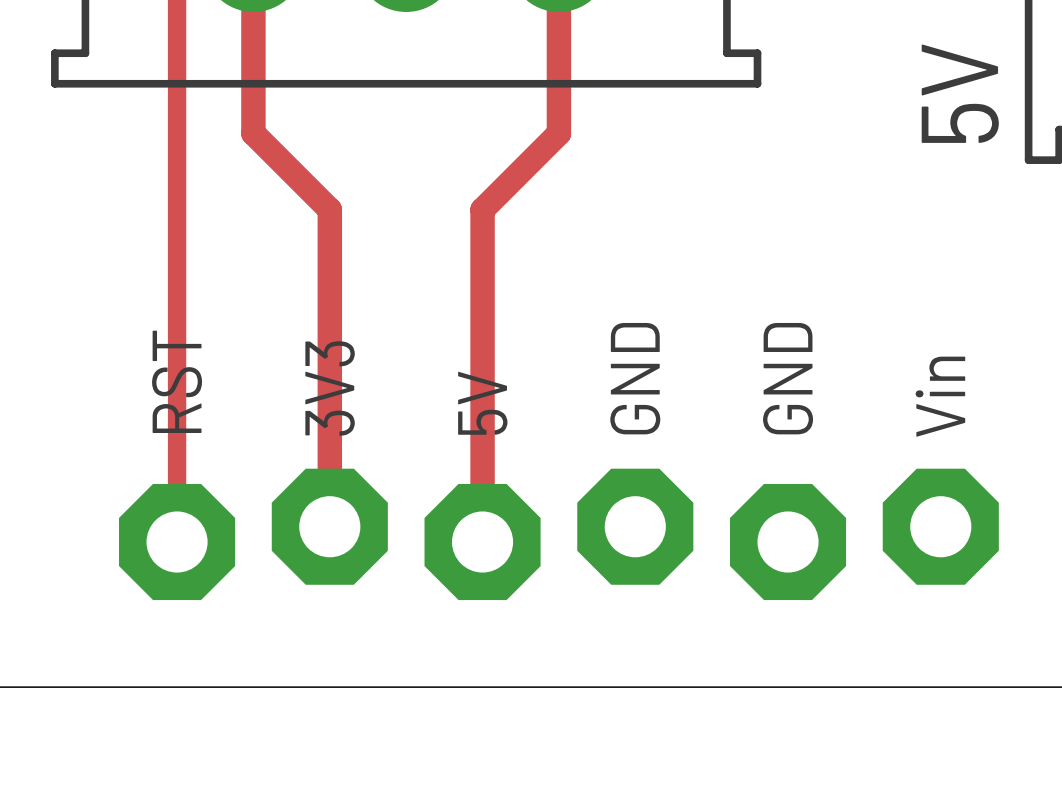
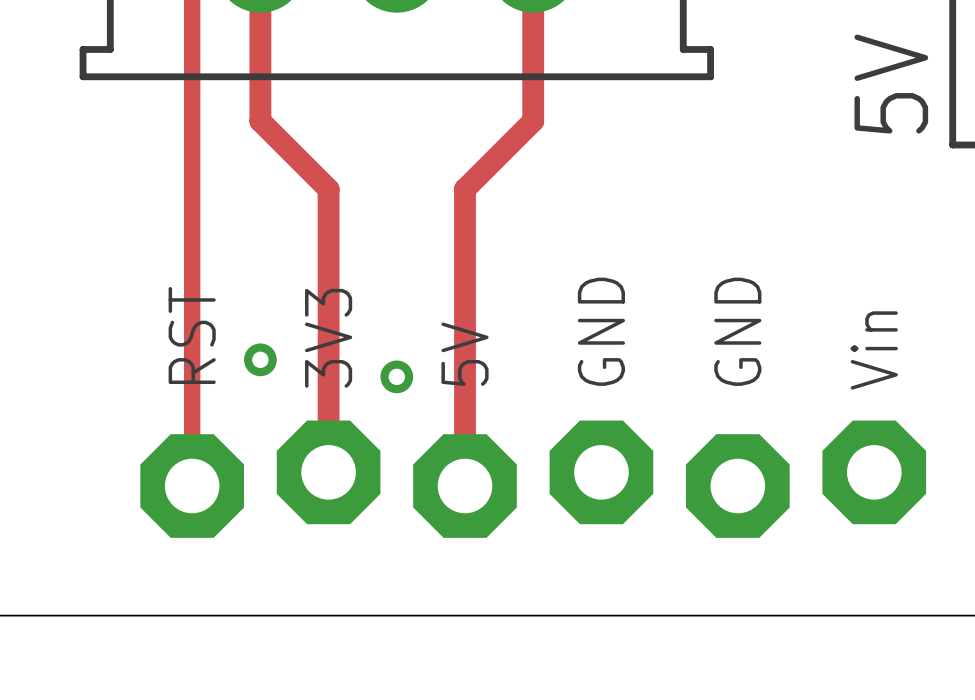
via: none -> (260, 359)
via: none -> (396, 376)

